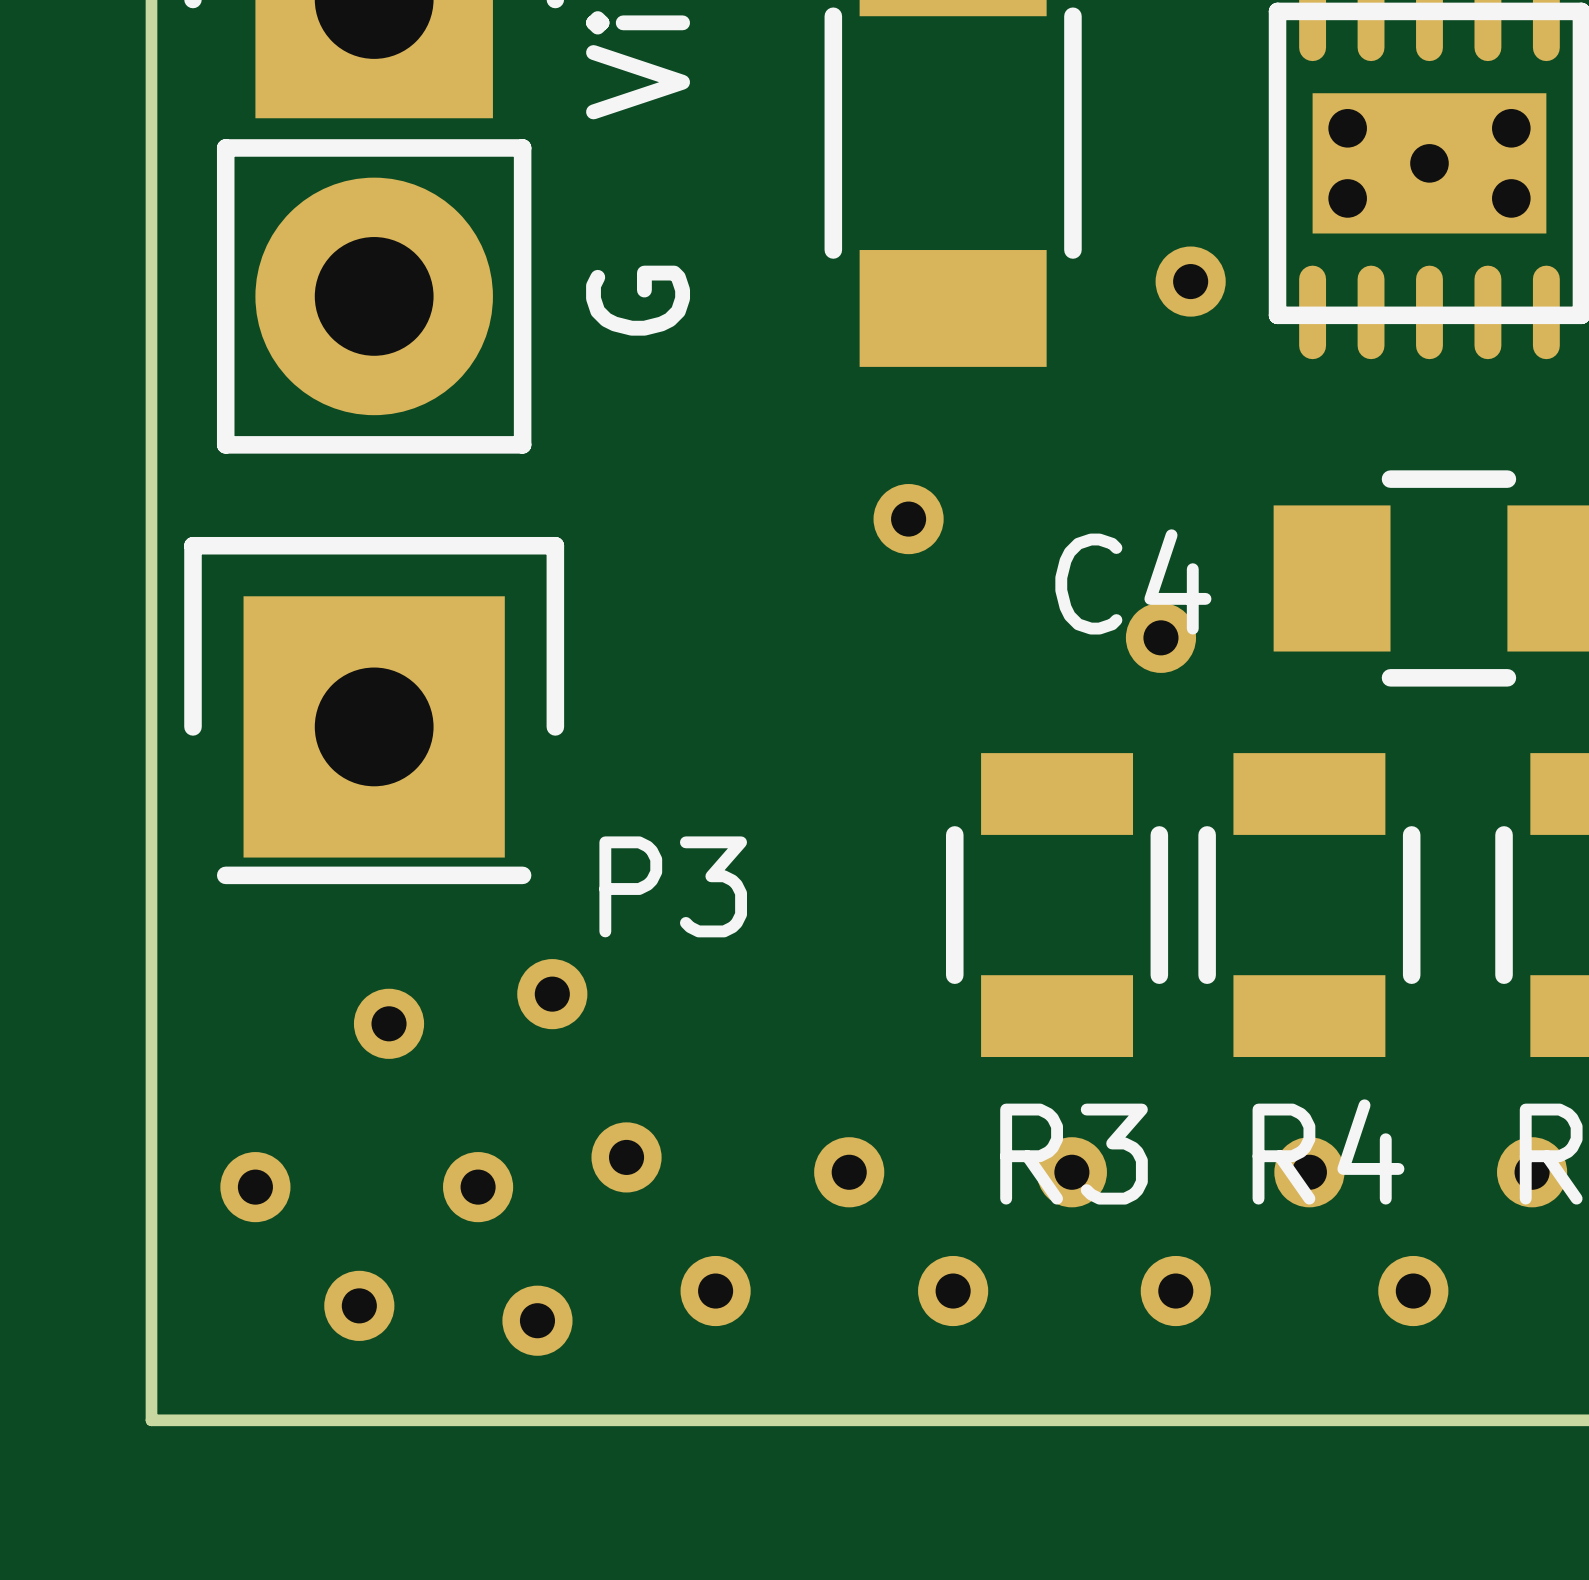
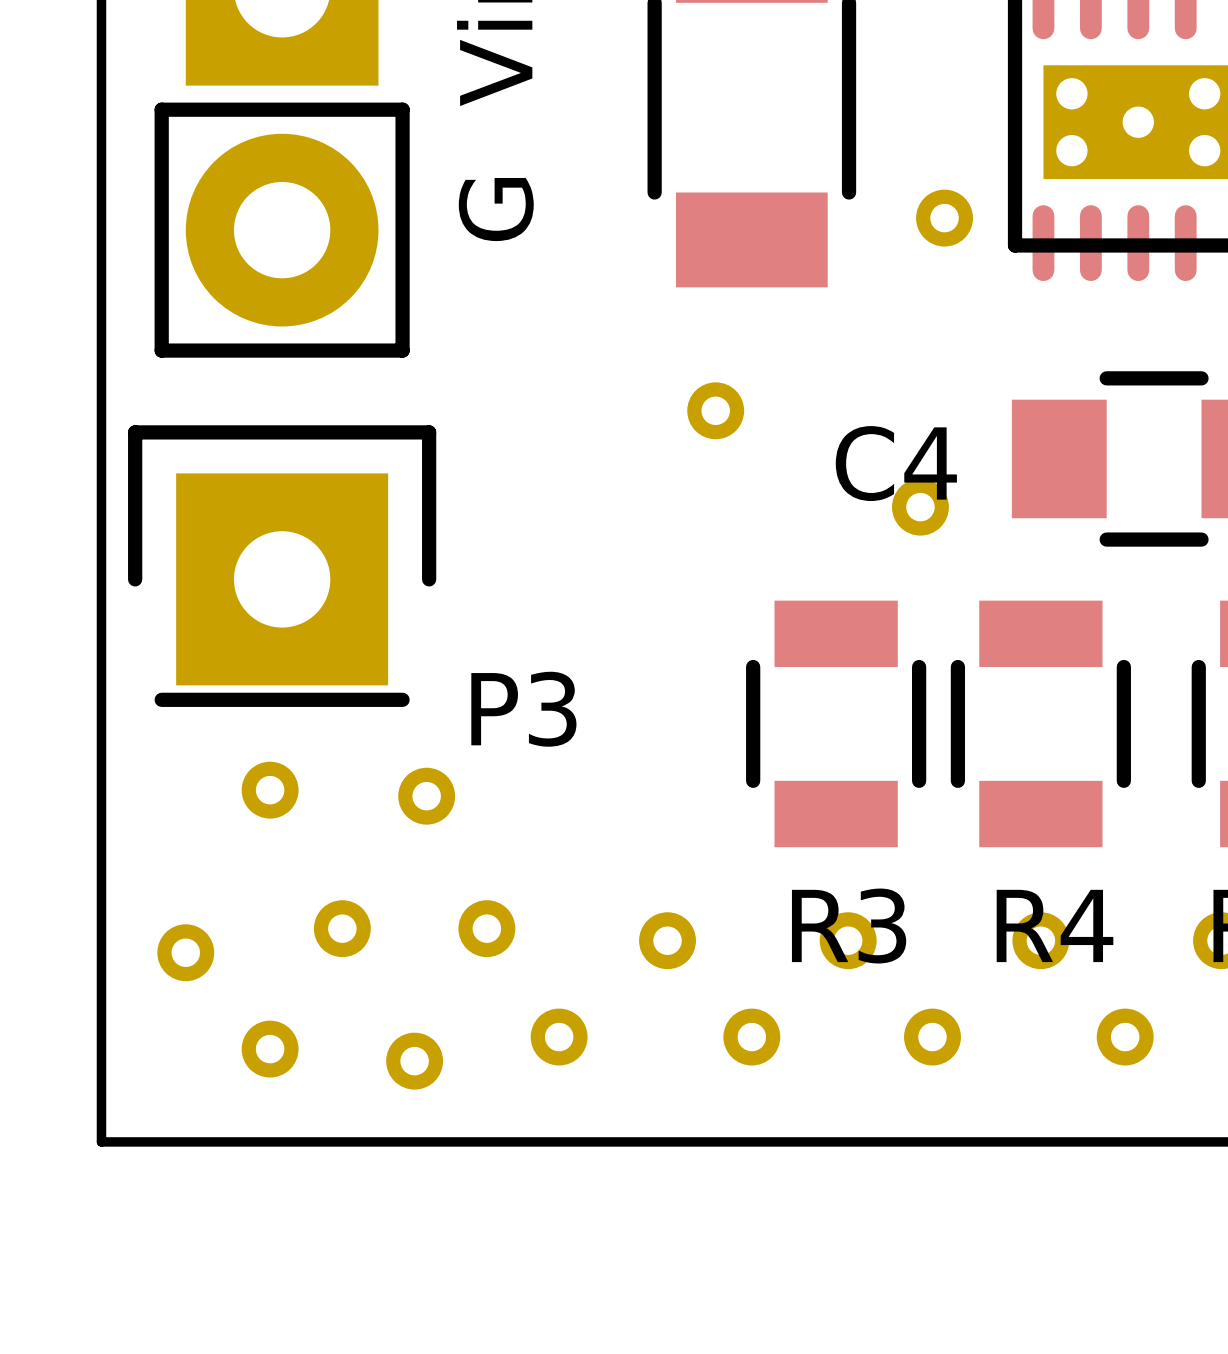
part position: (389, 1023) -> (270, 790)
part position: (478, 1187) -> (342, 928)

